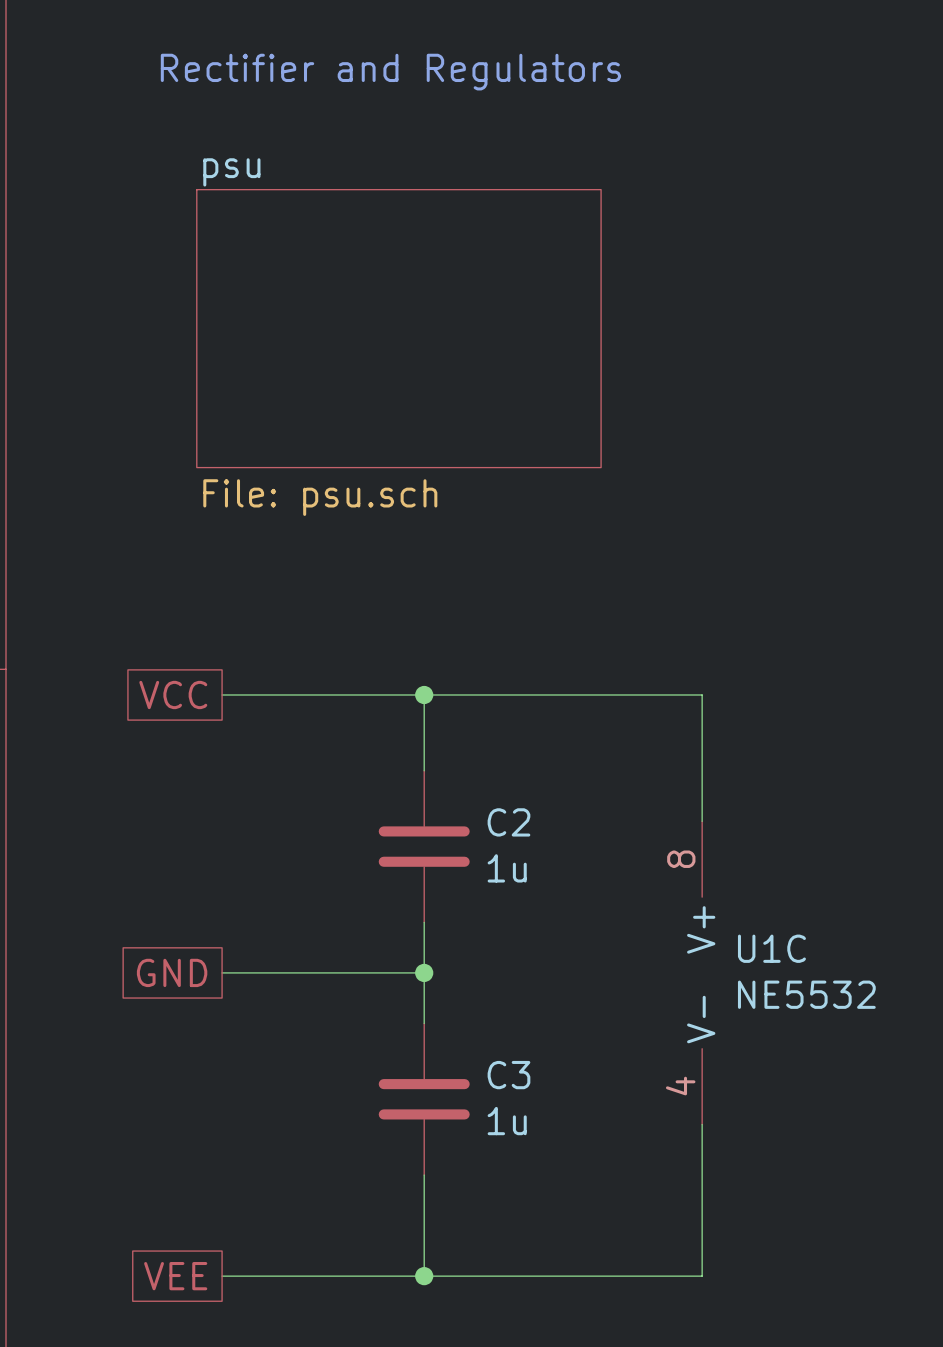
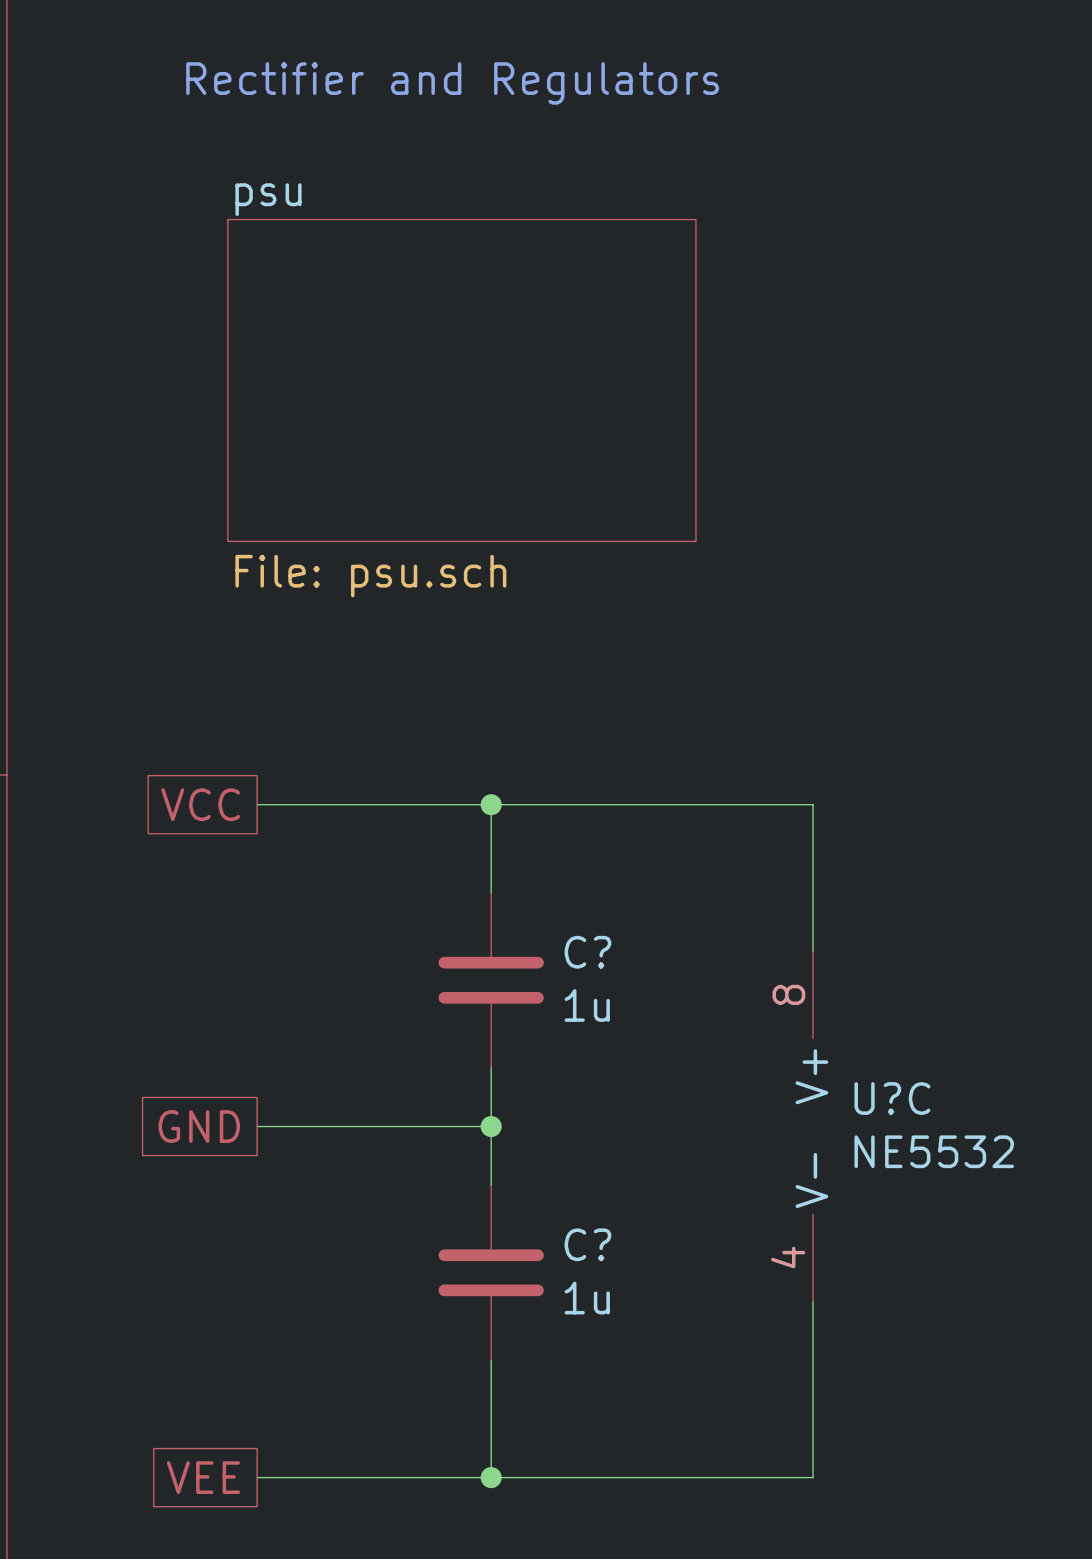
C2 name: C2 (508, 822) -> C? (587, 952)
U1C name: U1C (771, 948) -> U?C (892, 1098)
C3 name: C3 (508, 1075) -> C? (587, 1244)

